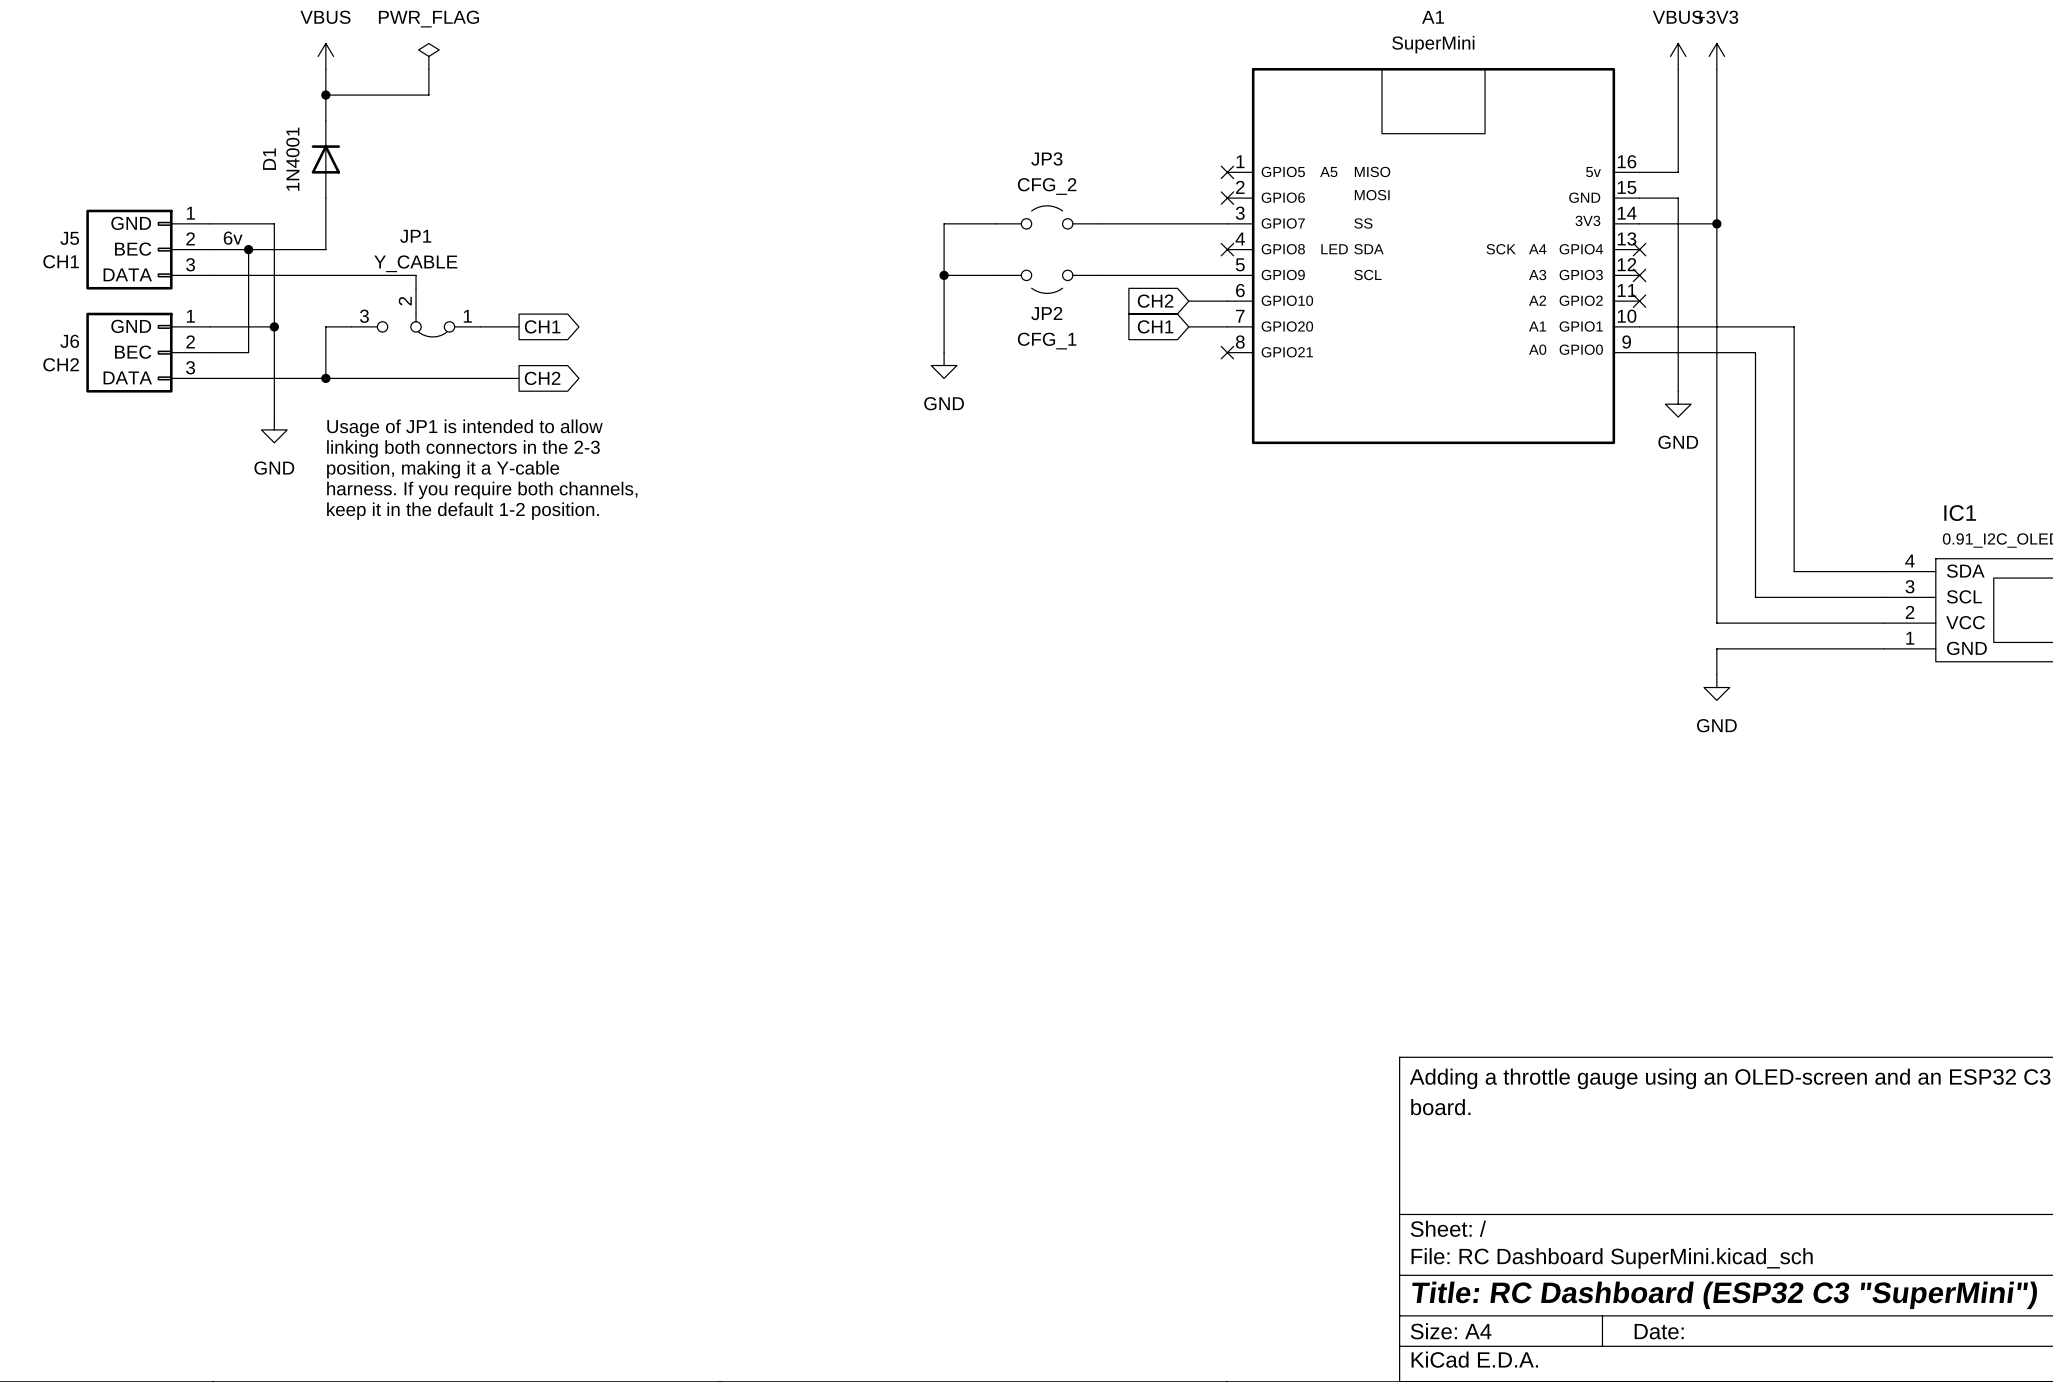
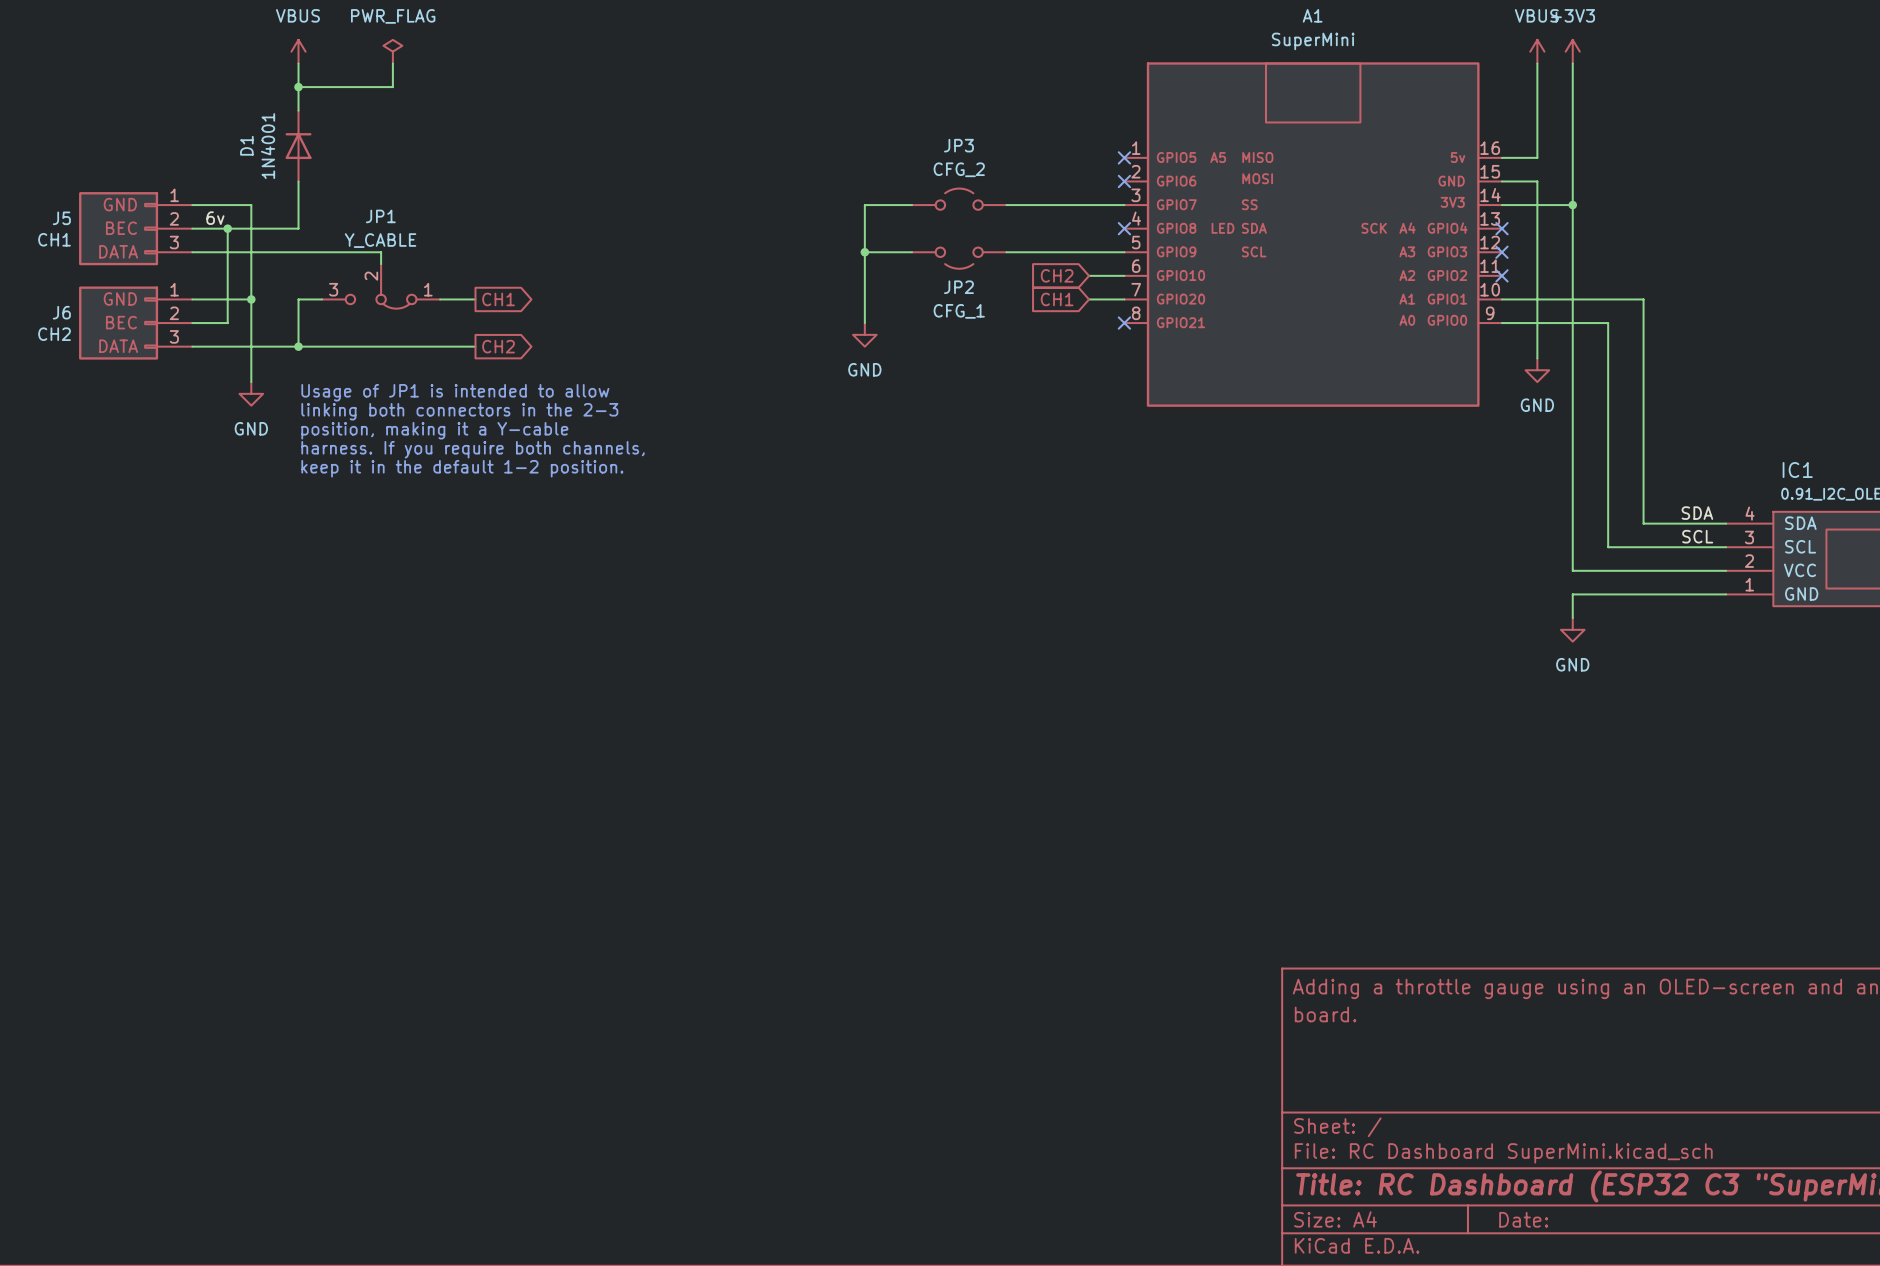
label: none -> SDA (1697, 513)
label: none -> SCL (1697, 536)

